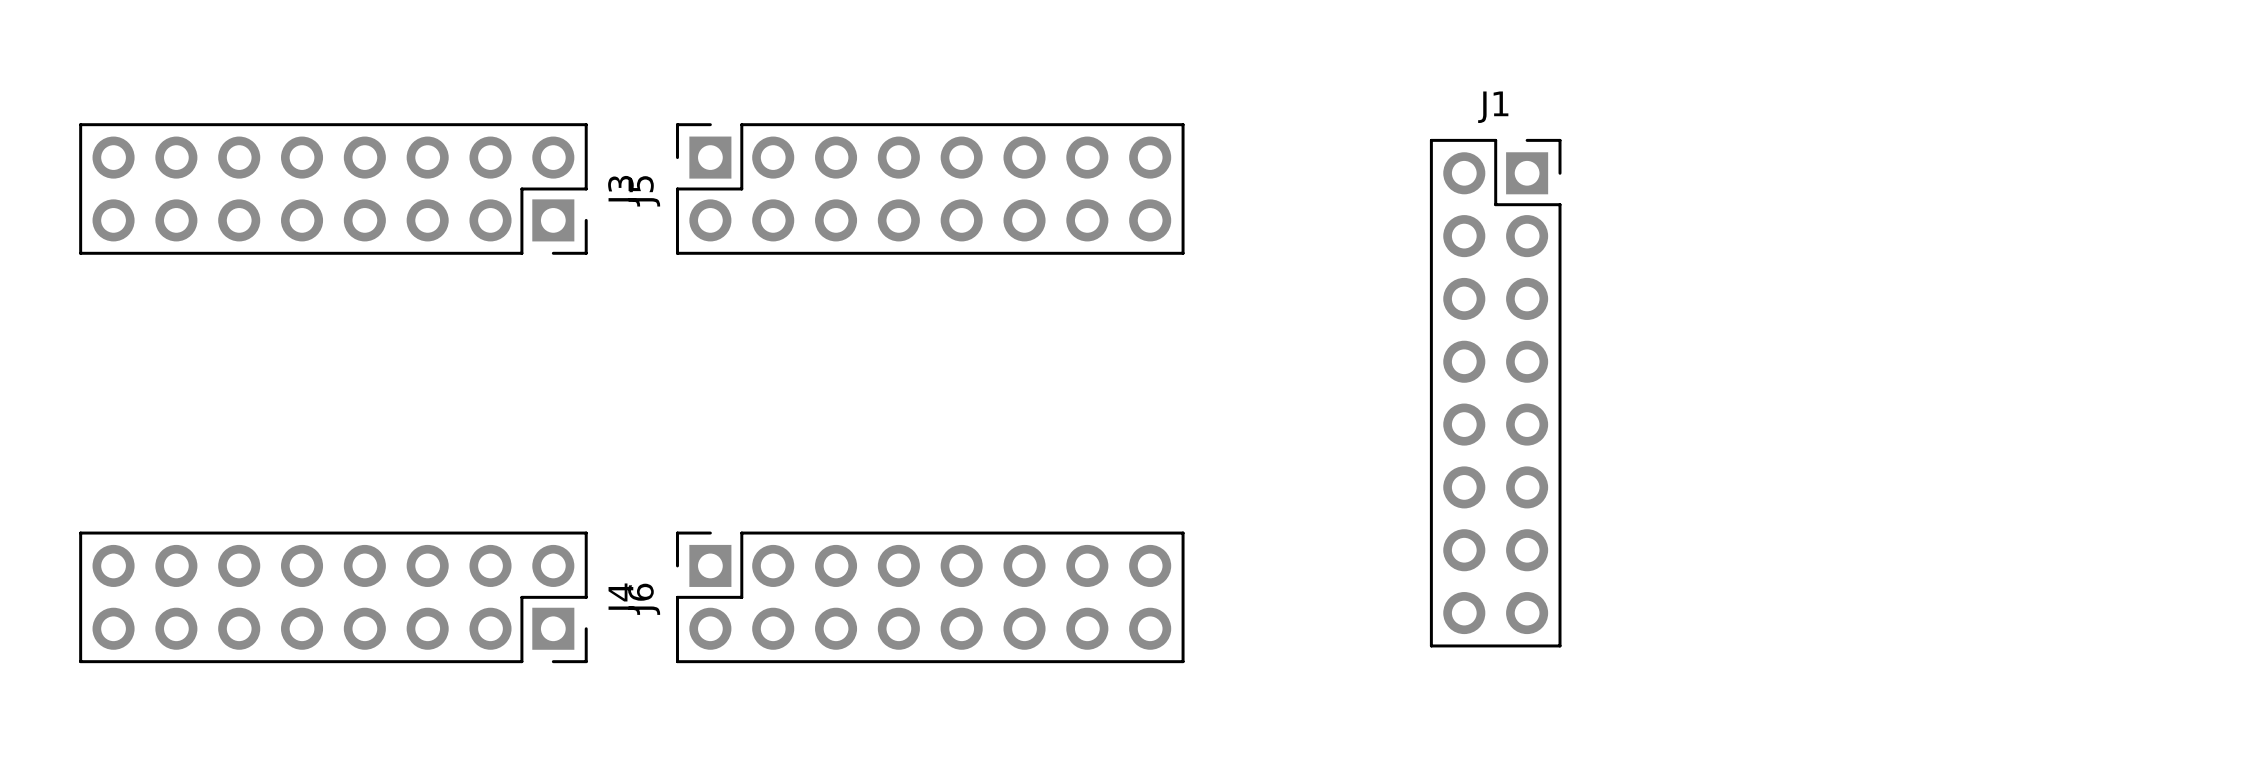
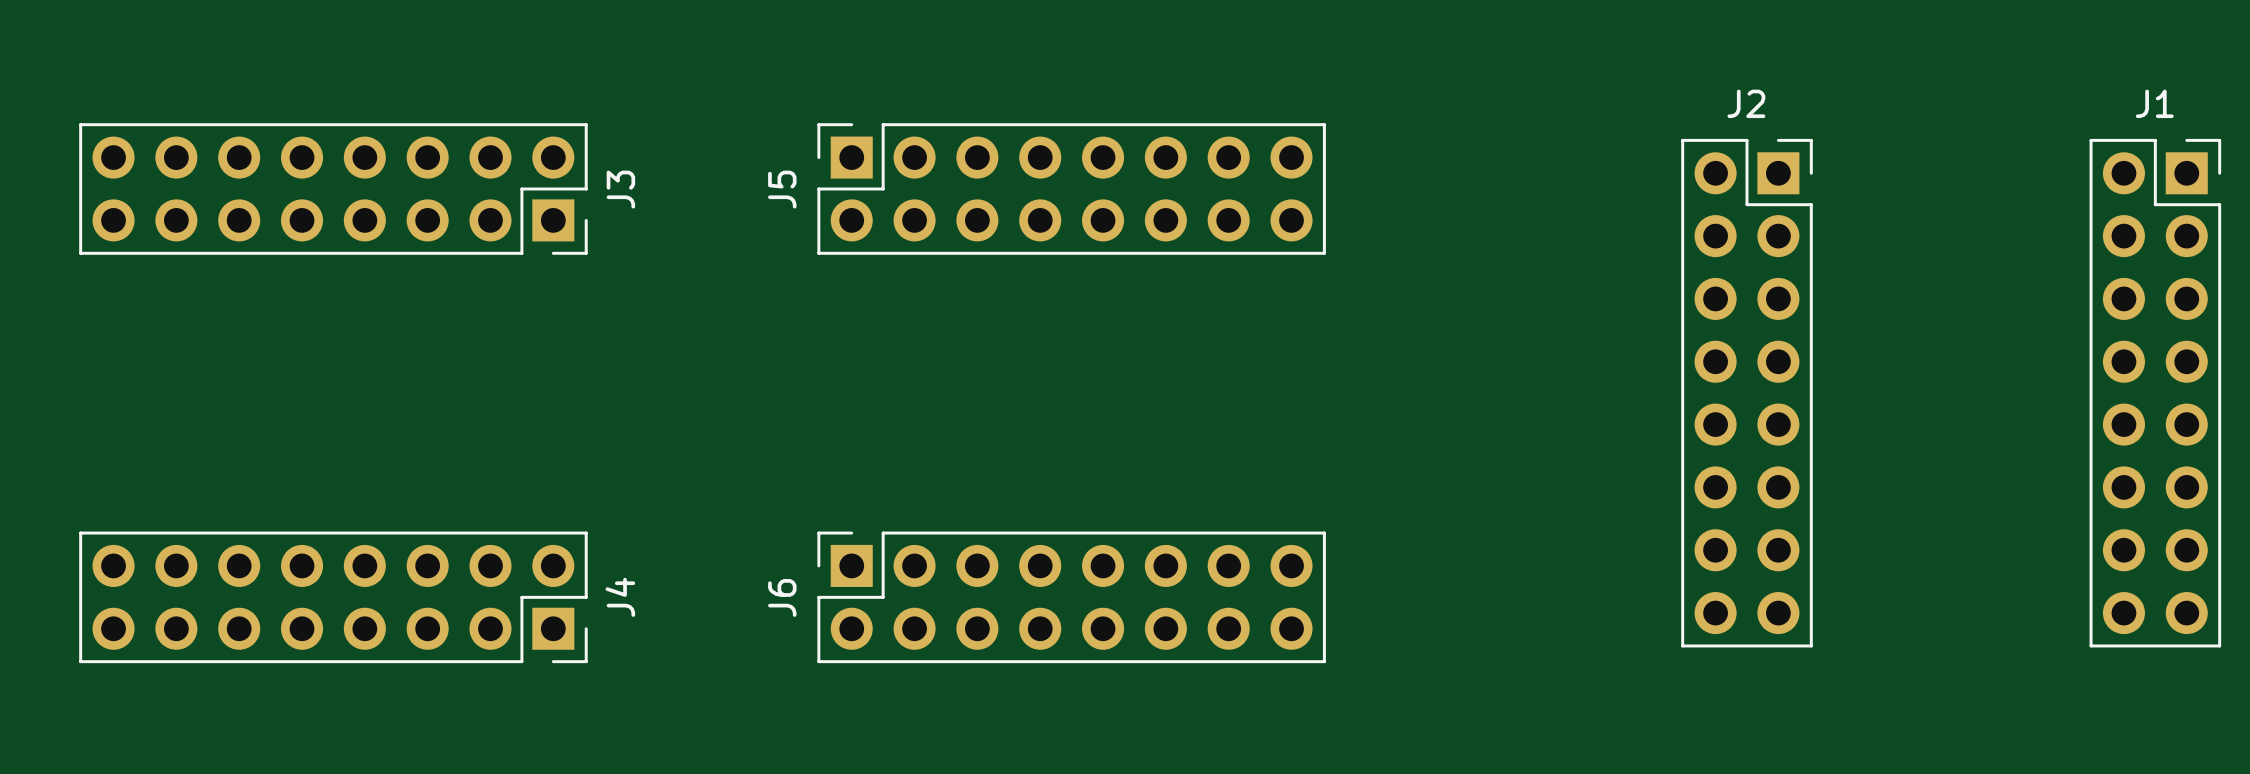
J5 position: (930, 188) -> (1071, 188)
J1 position: (1495, 393) -> (2155, 393)
J2: none -> (1747, 393)
J6 position: (930, 597) -> (1071, 597)

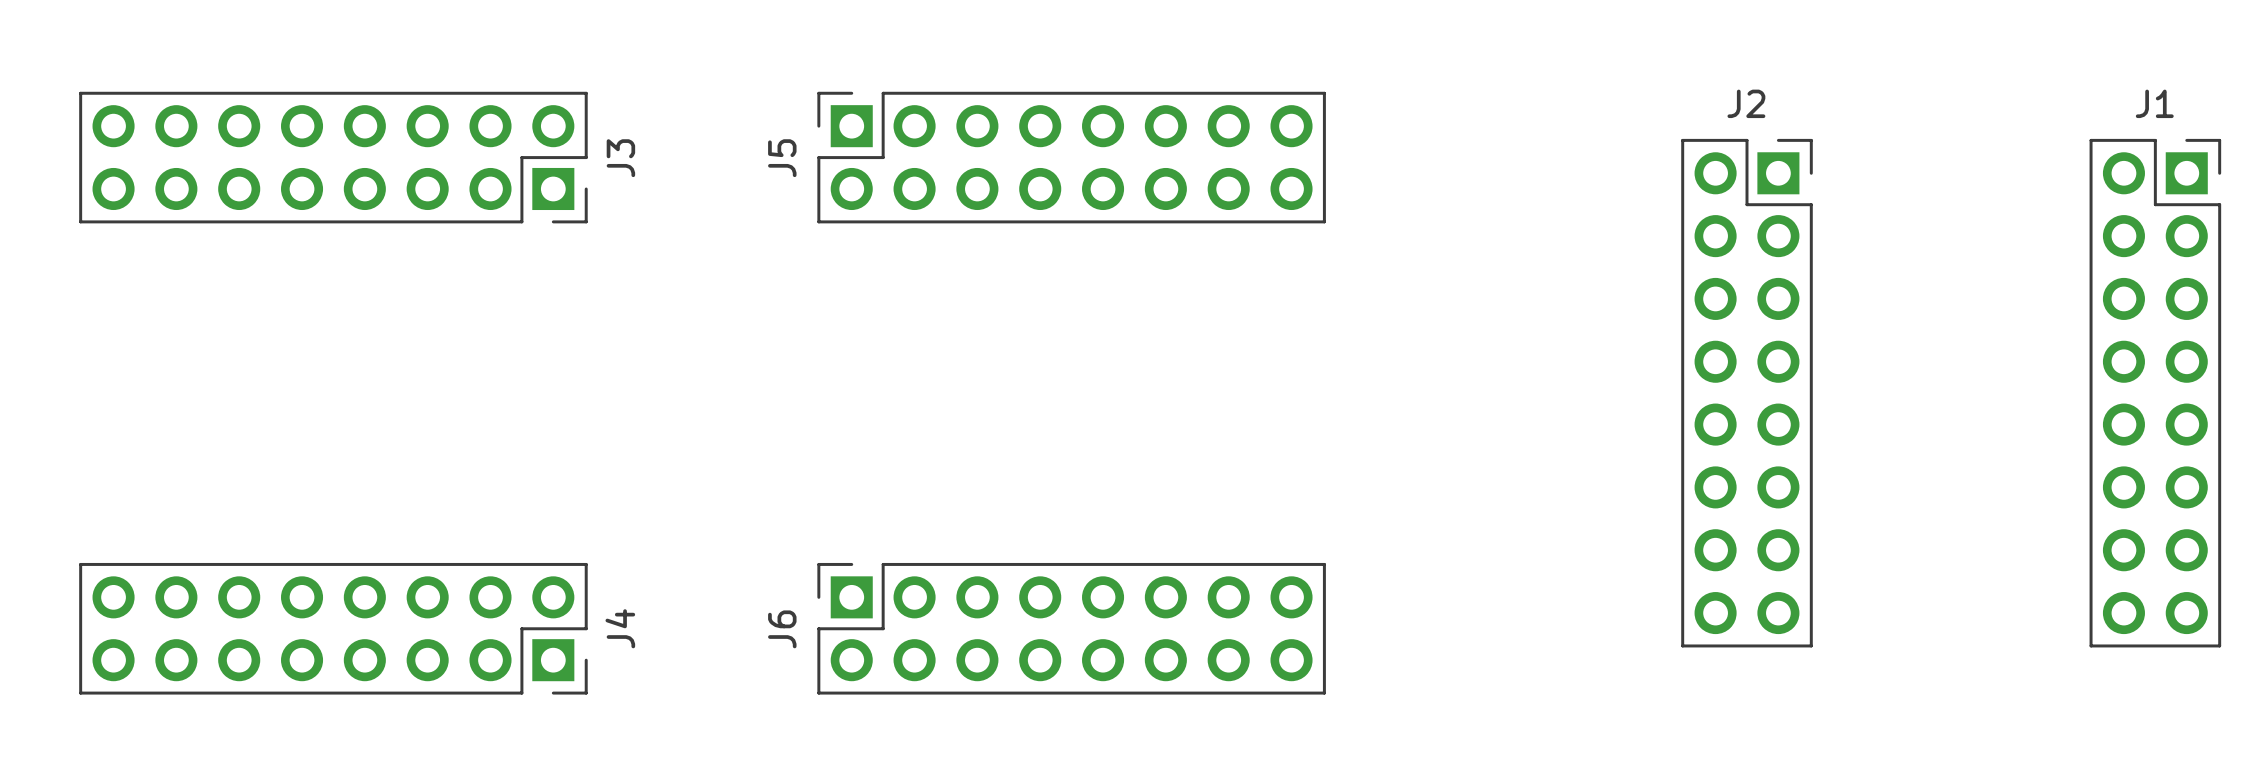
J3 position: (333, 188) -> (333, 157)
J5 position: (1071, 188) -> (1071, 157)
J4 position: (333, 597) -> (333, 628)
J6 position: (1071, 597) -> (1071, 628)

